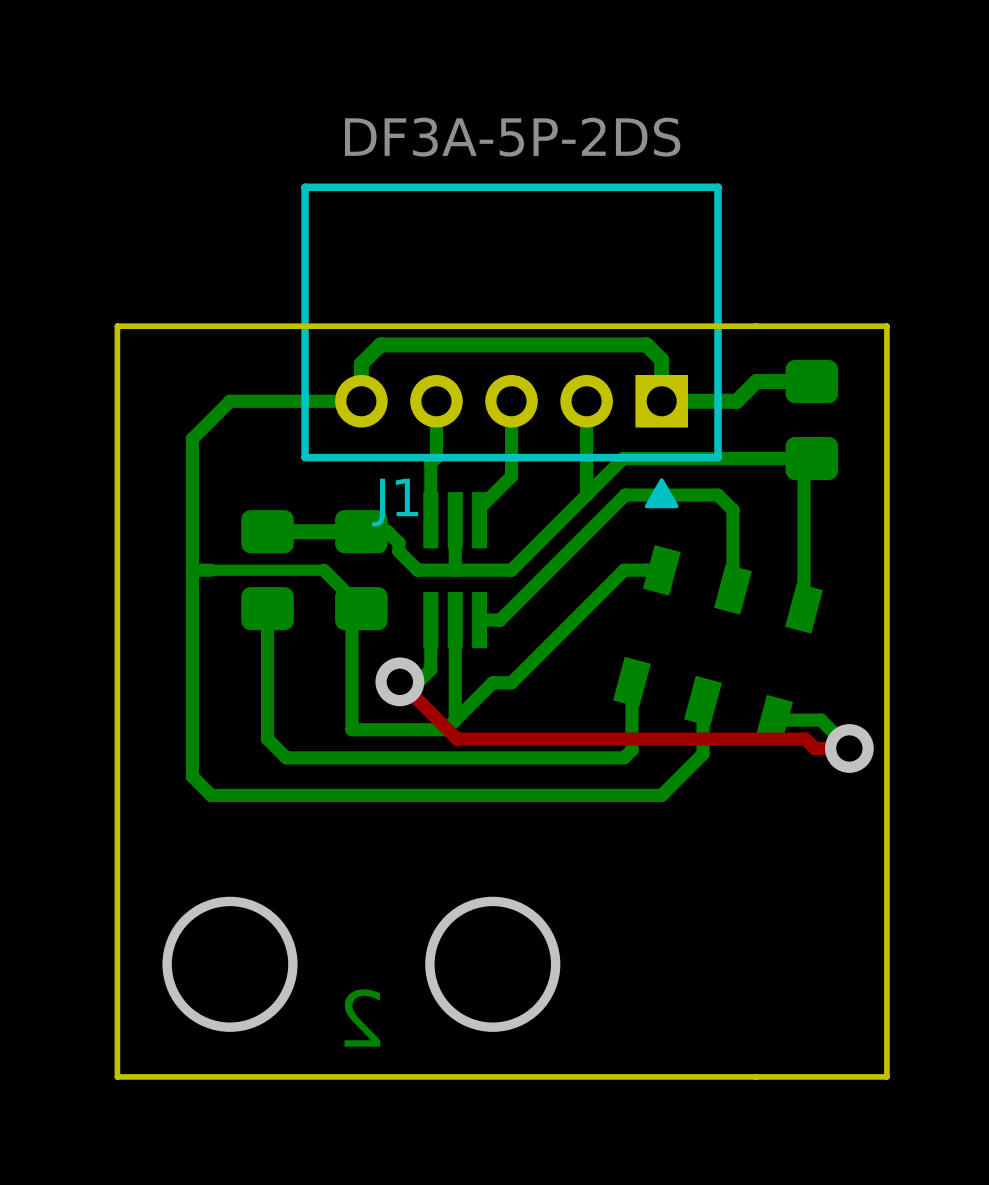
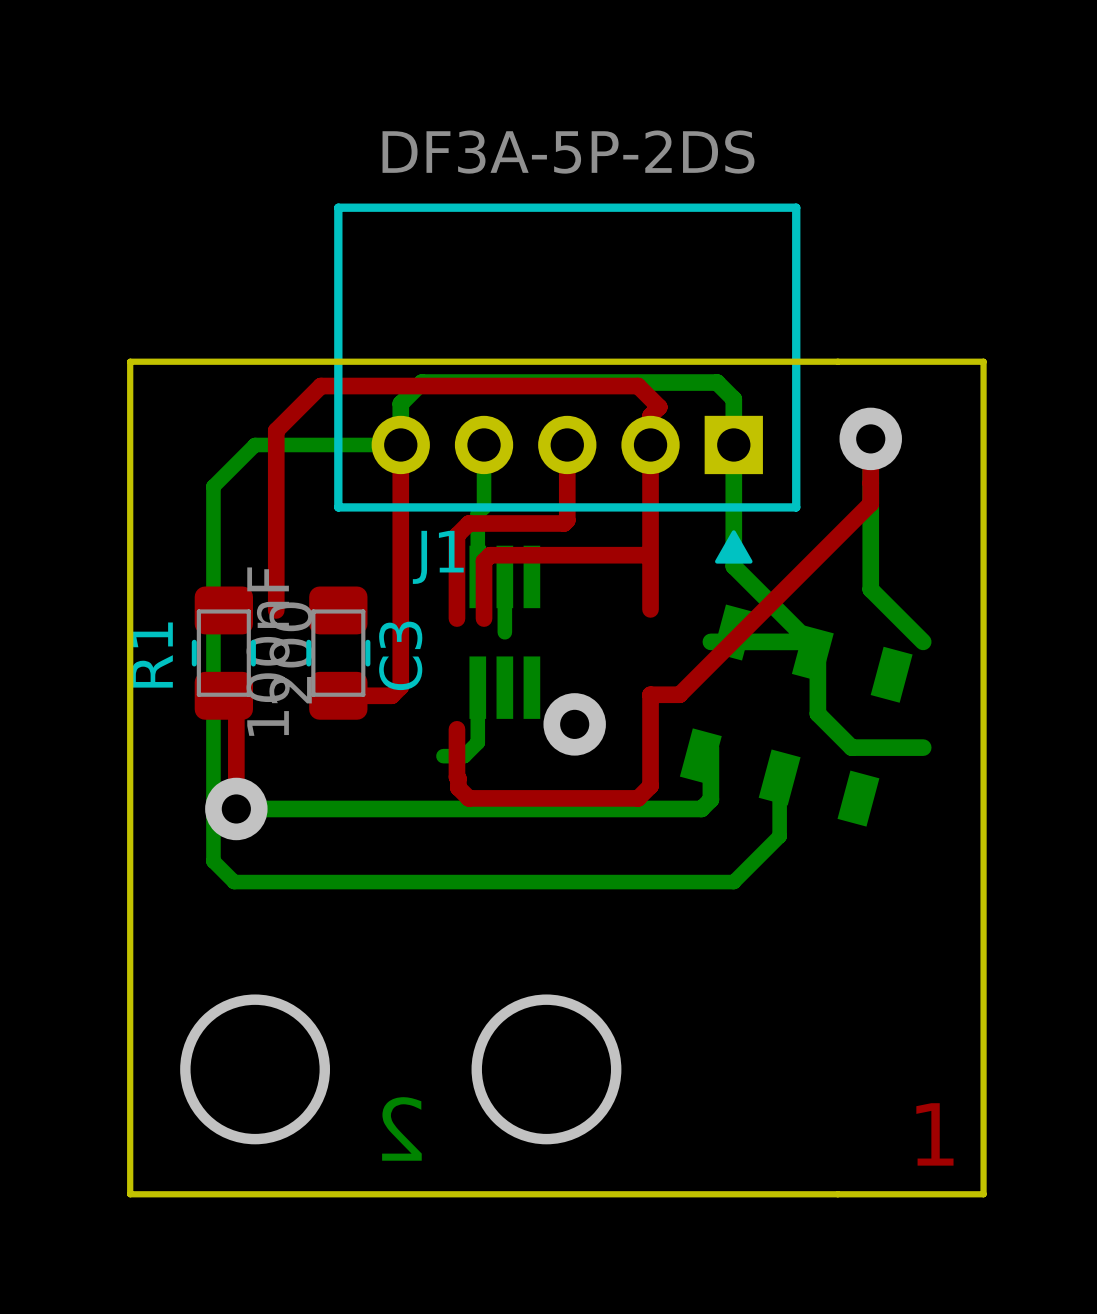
bottom track: (811, 381) (756, 381) (736, 401) (661, 401) -> (923, 747) (851, 747) (817, 713) (817, 650) (733, 566) (733, 444)
bottom track: none -> (870, 438) (870, 589) (923, 641)
top track: none -> (870, 438) (870, 503) (679, 694) (650, 694) (650, 785) (638, 798) (468, 798) (458, 787) (456, 729)
via: none -> (870, 438)
top track: none -> (400, 444) (400, 686) (391, 695) (338, 695)
bottom track: (511, 401) (511, 476) (479, 508) (479, 520) -> none
top track: none -> (567, 444) (567, 520) (564, 523) (468, 523) (456, 535) (456, 618)
bottom track: (586, 401) (586, 495) -> none
part: (811, 420) -> none
top track: none -> (648, 555) (490, 555) (484, 561) (484, 618)
bottom track: (267, 531) (387, 531) (398, 542) (398, 551) (417, 570) (511, 570) (623, 458) (811, 458) (804, 466) (804, 608) -> none
top track: none -> (650, 609) (650, 415) (659, 407) (638, 386) (320, 386) (276, 430) (276, 610)
bottom track: (192, 570) (323, 570) (361, 607) -> none
R1 side: bottom (267, 570) -> top (223, 653)
C3 side: bottom (361, 570) -> top (338, 653)
bottom track: (647, 570) (624, 570) (511, 682) (492, 682) (445, 729) (352, 729) (352, 618) (361, 608) -> none
bottom track: none -> (710, 641) (809, 641)
bottom track: (732, 589) (732, 510) (718, 495) (625, 495) (500, 620) (479, 620) -> none
bottom track: (267, 608) (267, 739) (286, 757) (624, 757) (631, 750) (631, 682) -> none
bottom track: (455, 620) (455, 720) -> none
top track: none -> (223, 695) (236, 708) (236, 808)
via: none -> (574, 724)
bottom track: none -> (710, 747) (710, 799) (701, 808) (236, 808)
top track: (399, 681) (457, 739) (805, 739) (814, 748) (849, 748) -> none
via: (399, 681) -> none
bottom track: (774, 720) (821, 720) (849, 748) -> none
via: none -> (236, 808)
via: (849, 748) -> none
text: none -> 1 (934, 1134)

